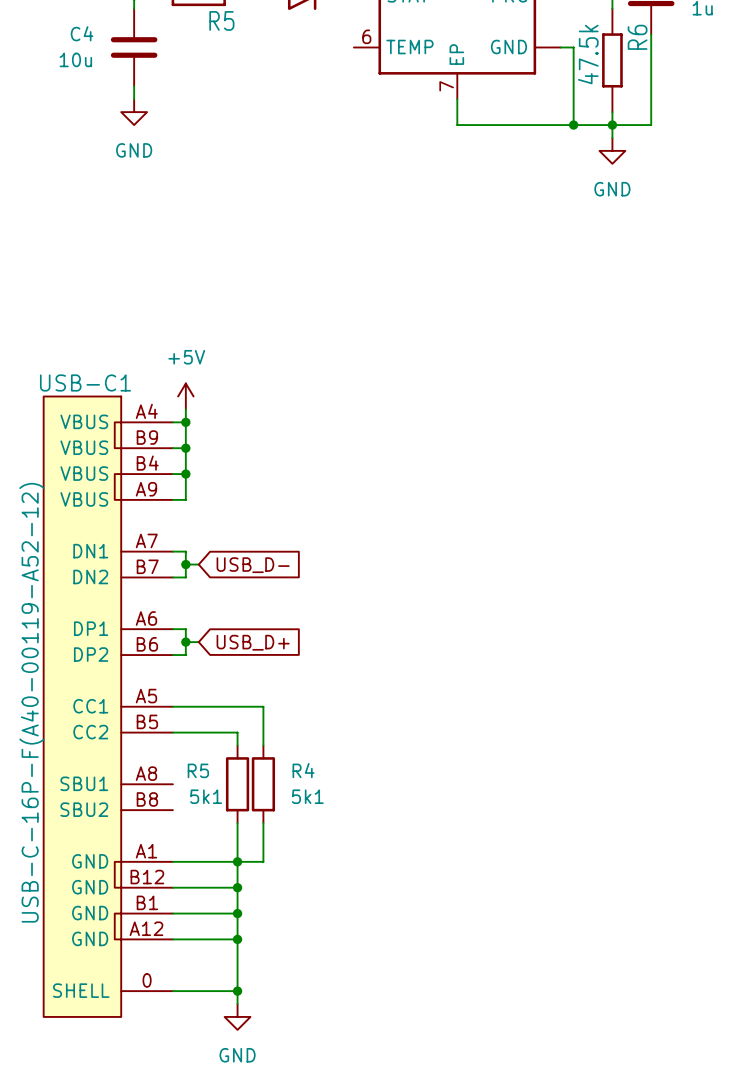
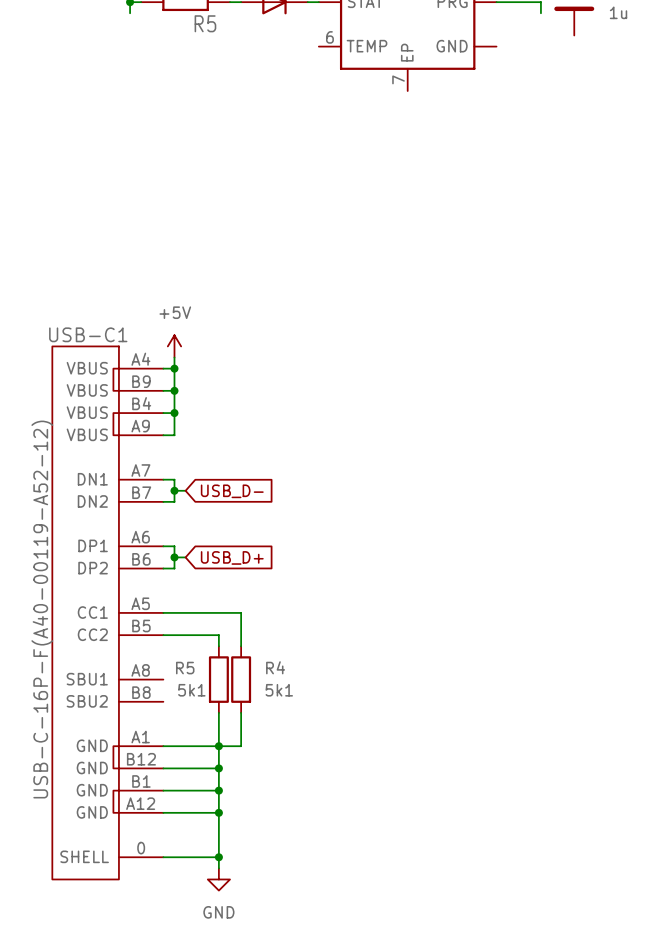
wire: (651, 34) (651, 125) (457, 125) (457, 99) -> none
C4: 10u (134, 47) -> none
wire: (560, 47) (573, 47) (573, 125) -> none
R6: 47.5k (612, 60) -> none
wire: (134, 86) (134, 99) -> none
power symbol: GND (134, 112) -> none
wire: (612, 112) (612, 137) -> none
junction: (573, 125) -> none
junction: (612, 125) -> none
power symbol: GND (612, 150) -> none

